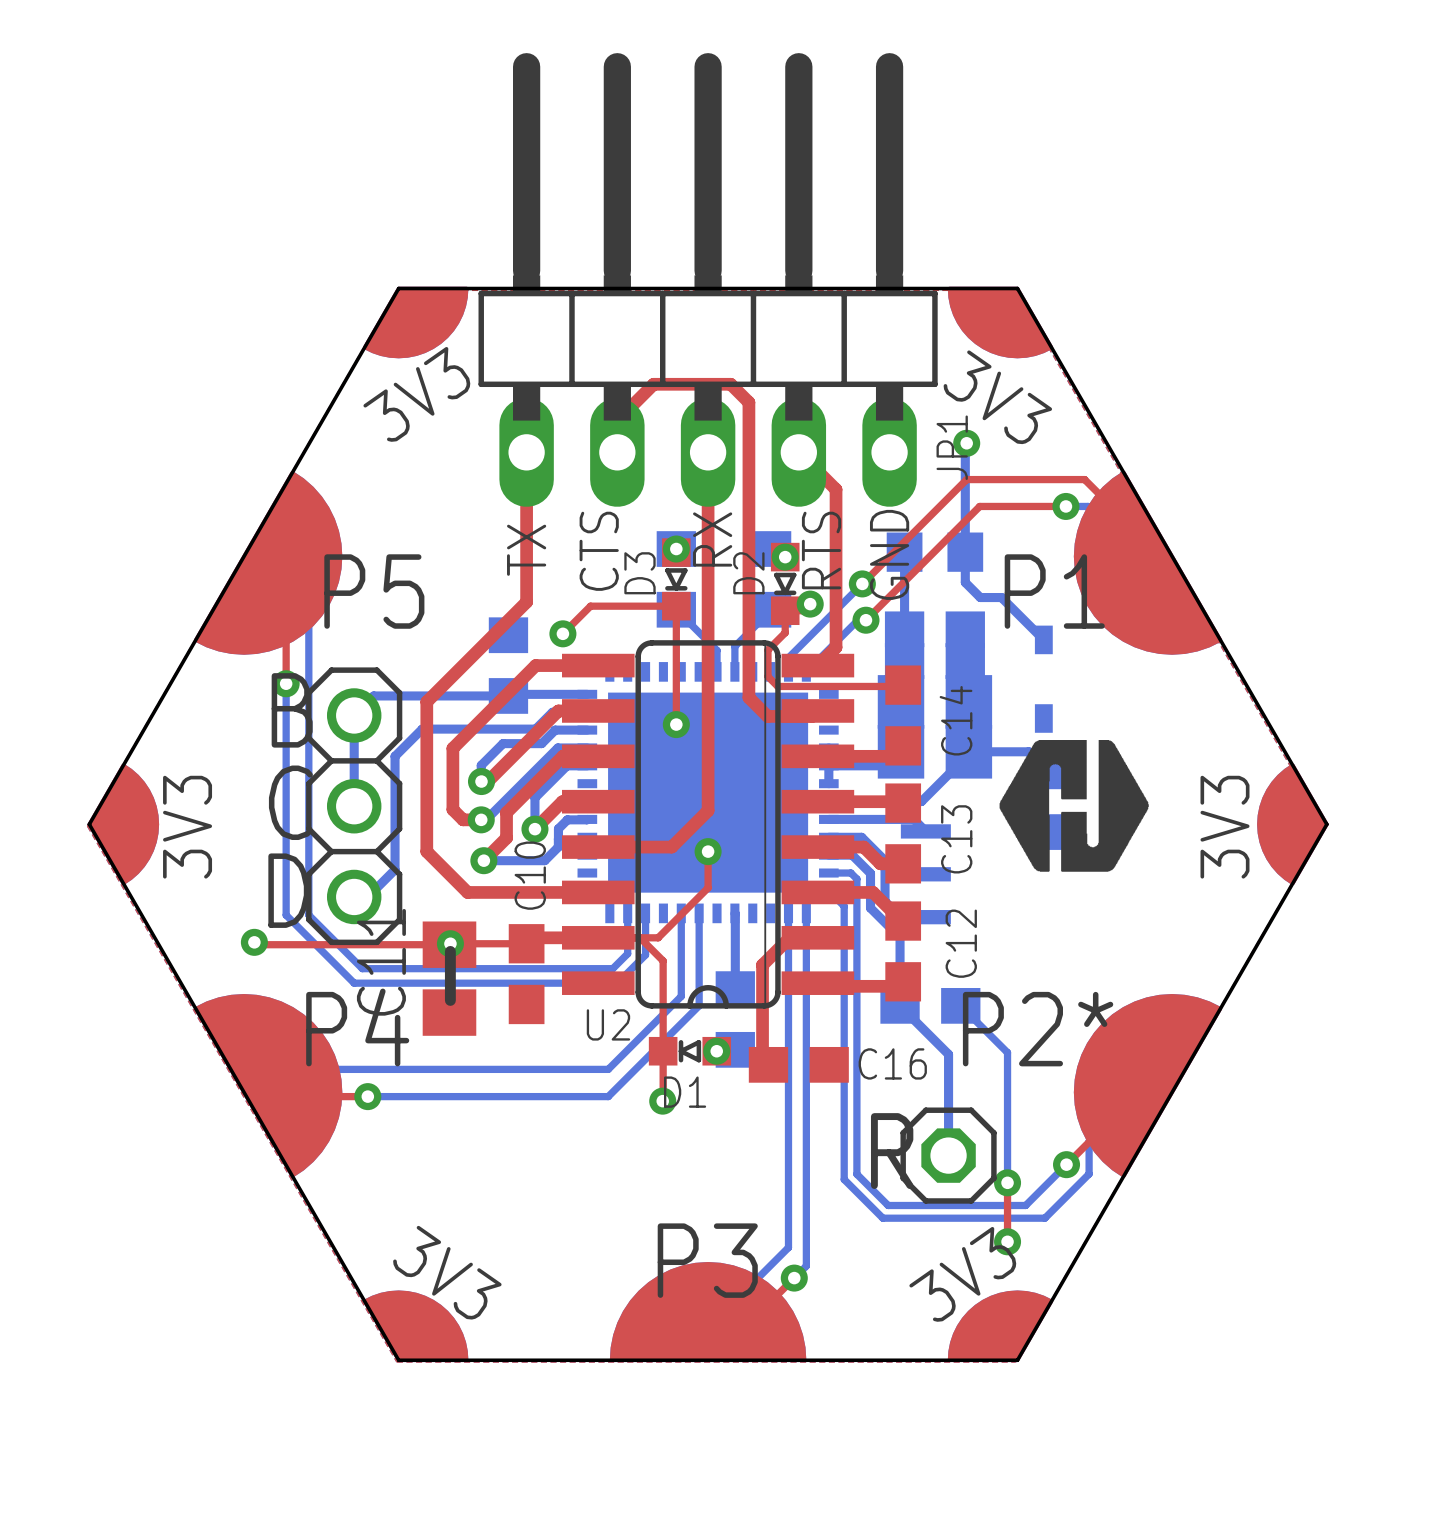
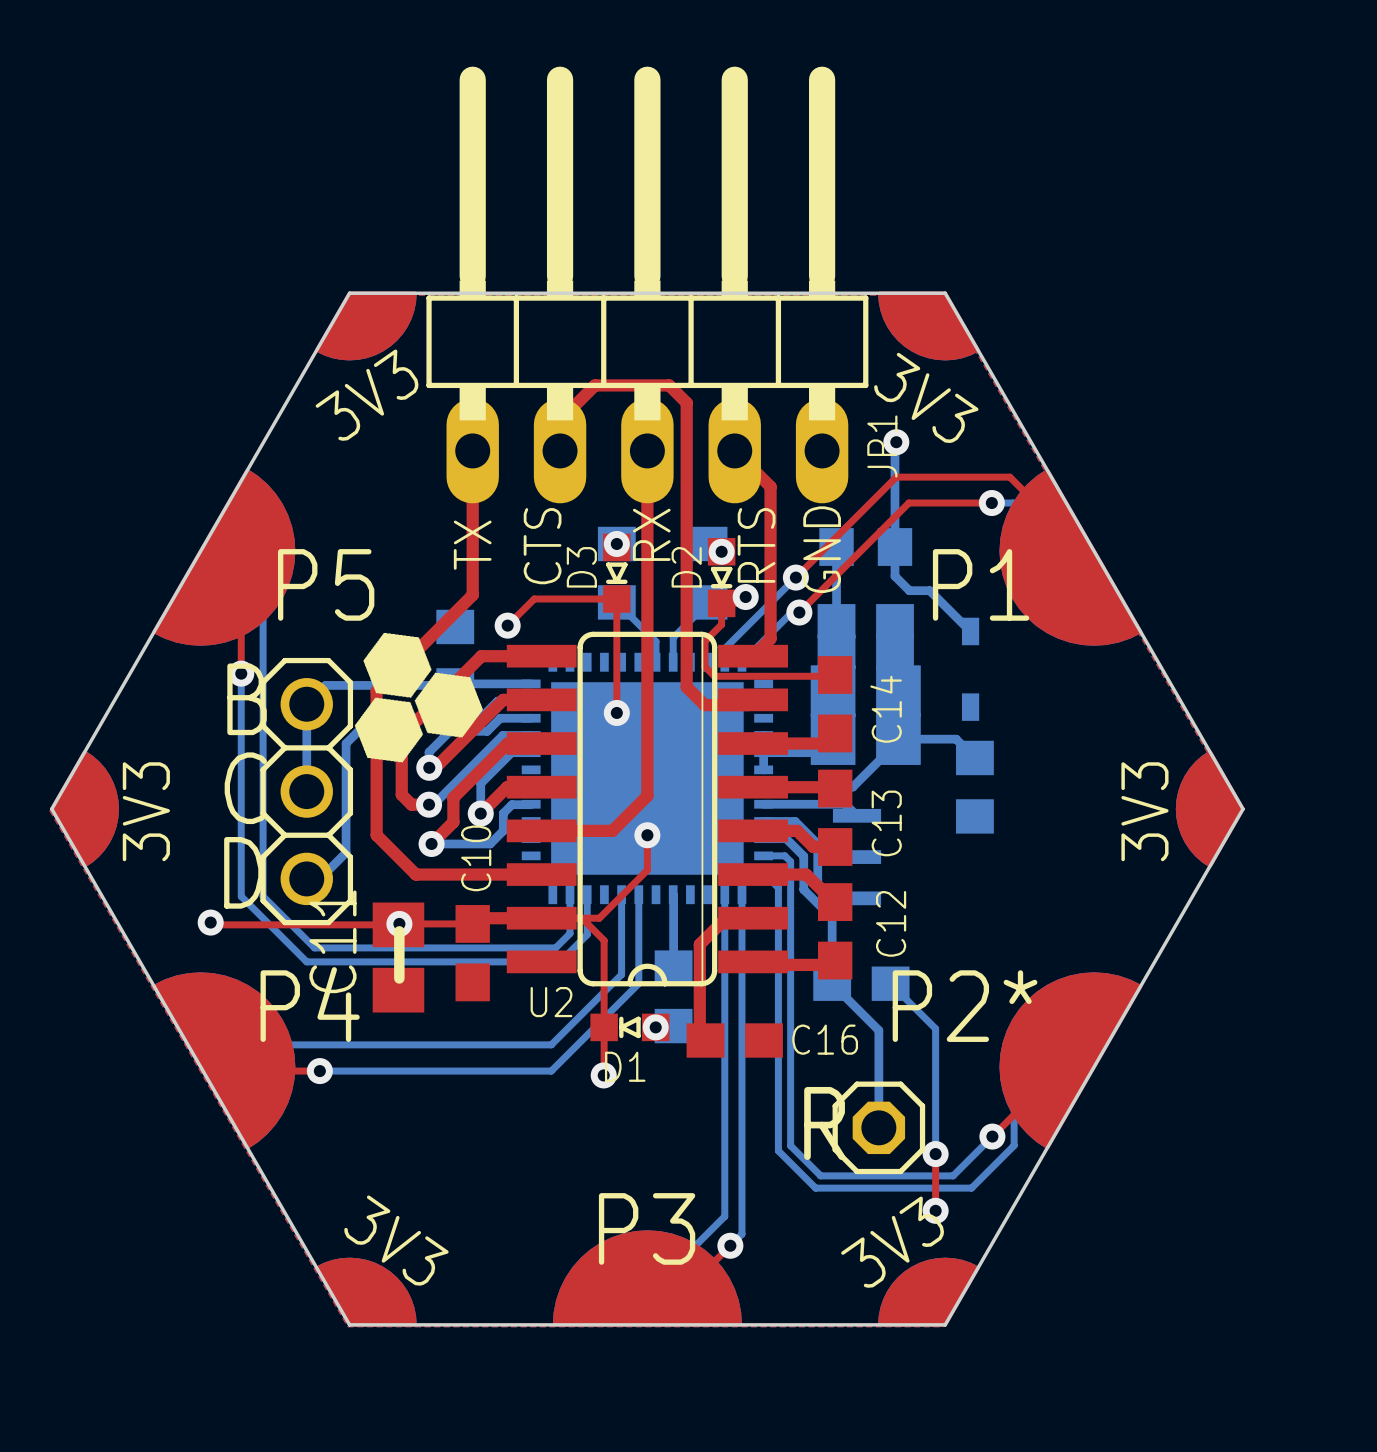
drawing: none -> [354, 632, 484, 763]
drawing: [999, 739, 1149, 872] -> none

